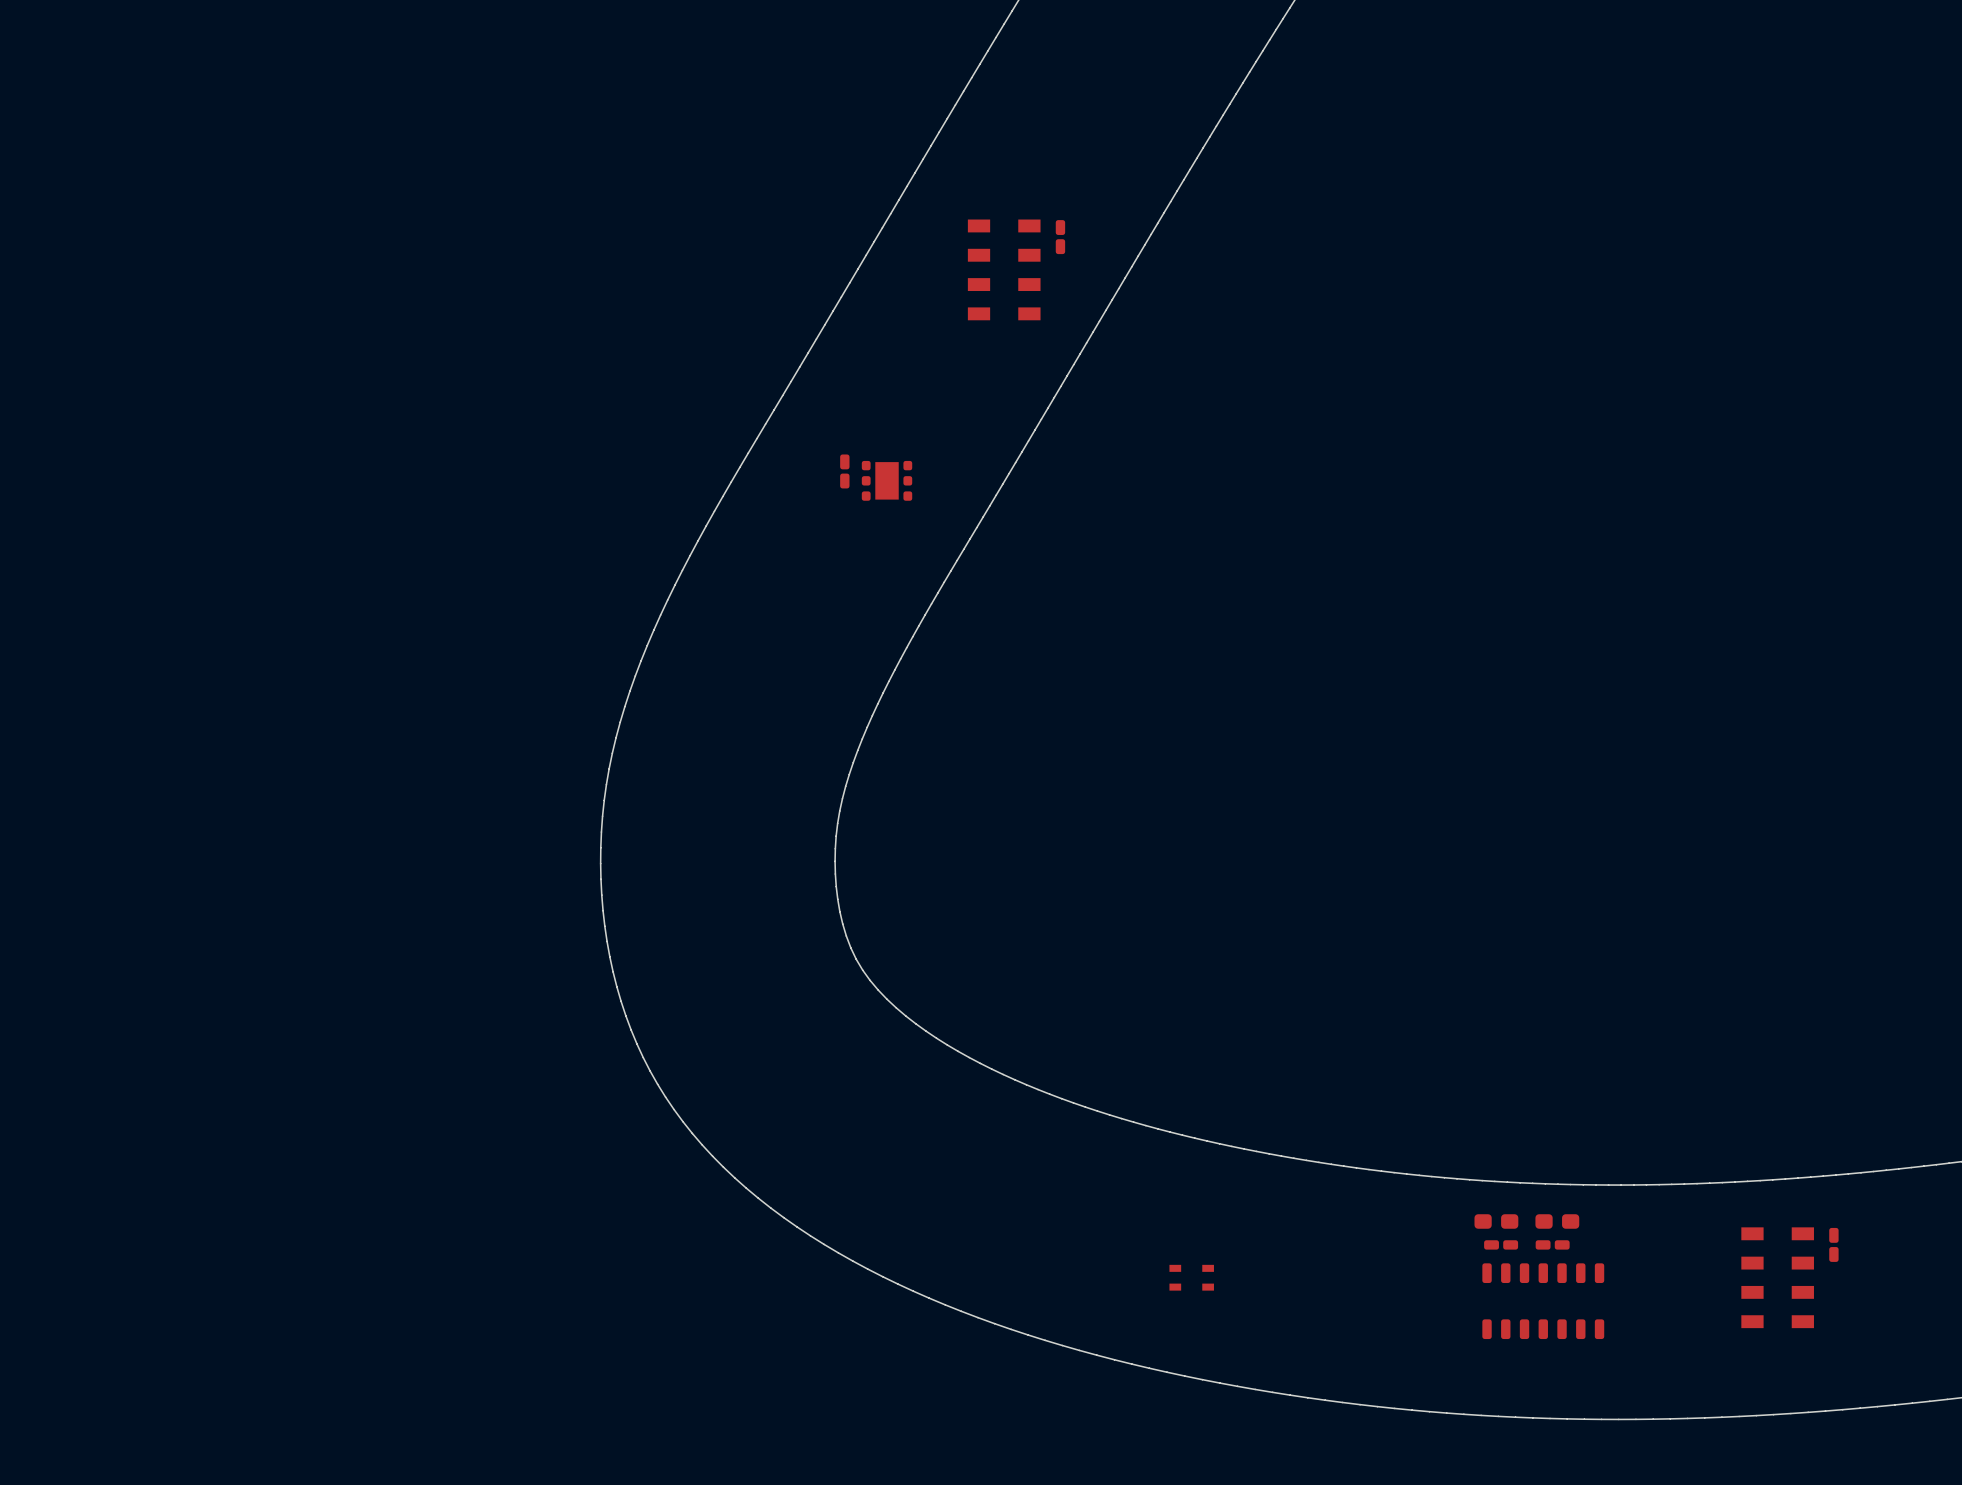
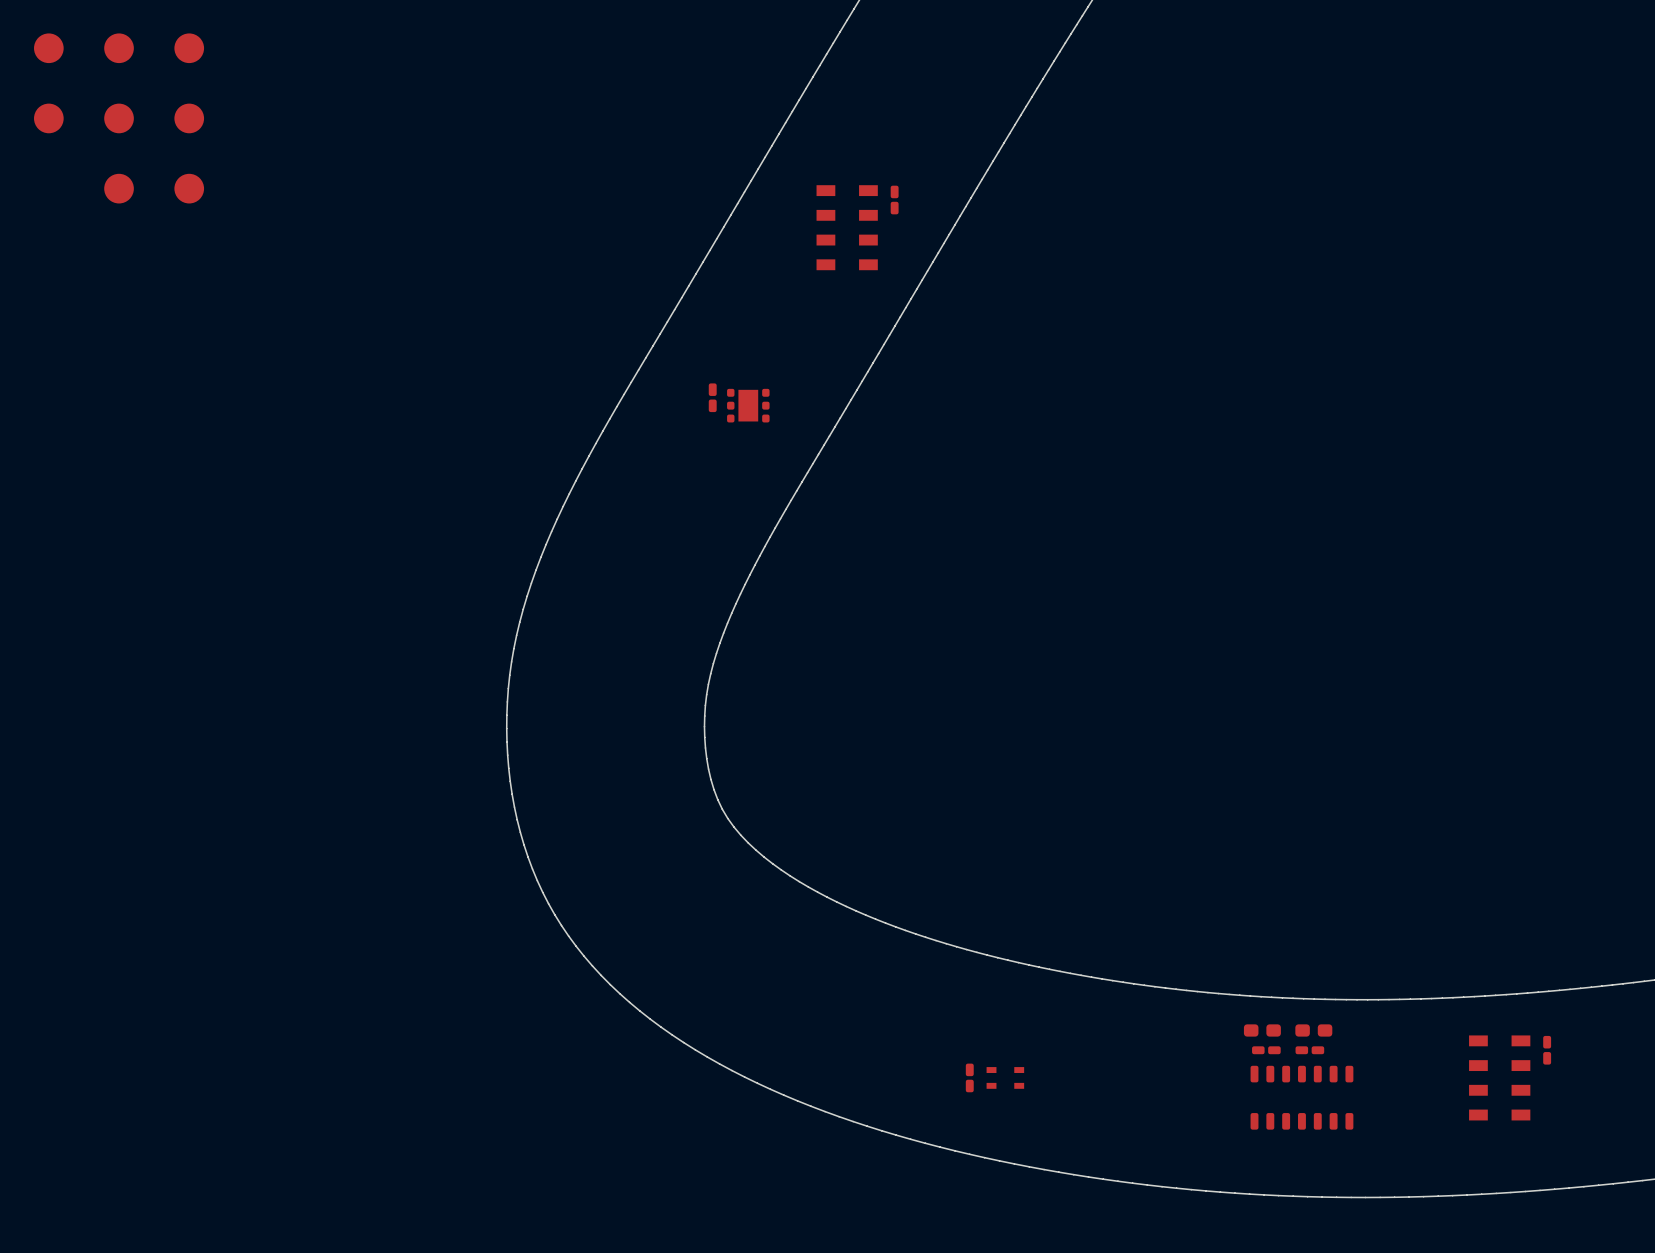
part: none -> (48, 48)
part: none -> (119, 48)
part: none -> (189, 48)
part: none -> (48, 118)
part: none -> (119, 118)
part: none -> (189, 118)
part: none -> (119, 188)
part: none -> (189, 188)
part: none -> (969, 1077)

